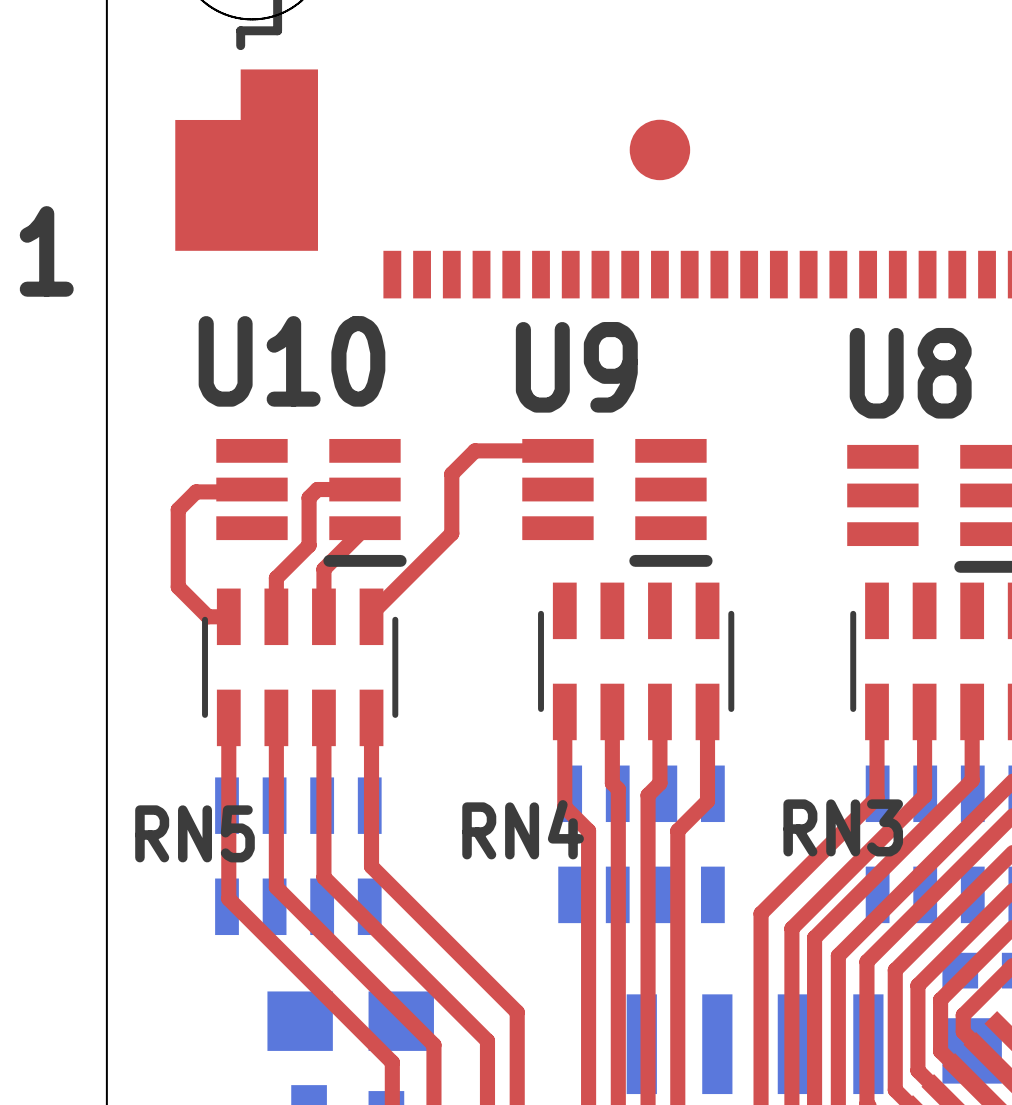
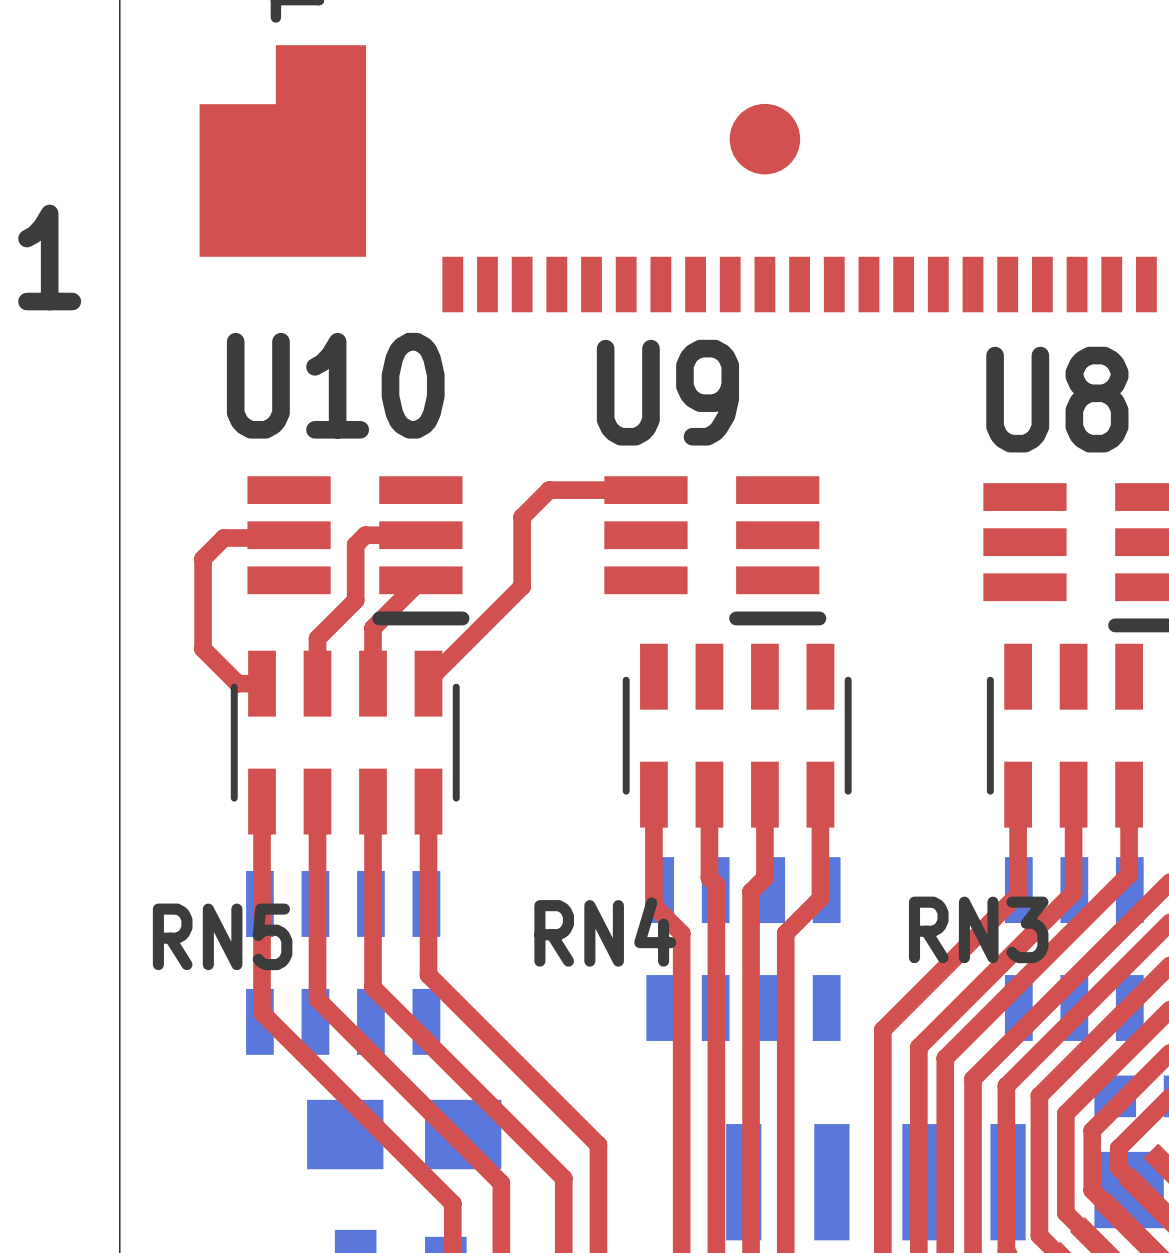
part position: (350, 1021) -> (404, 1134)

